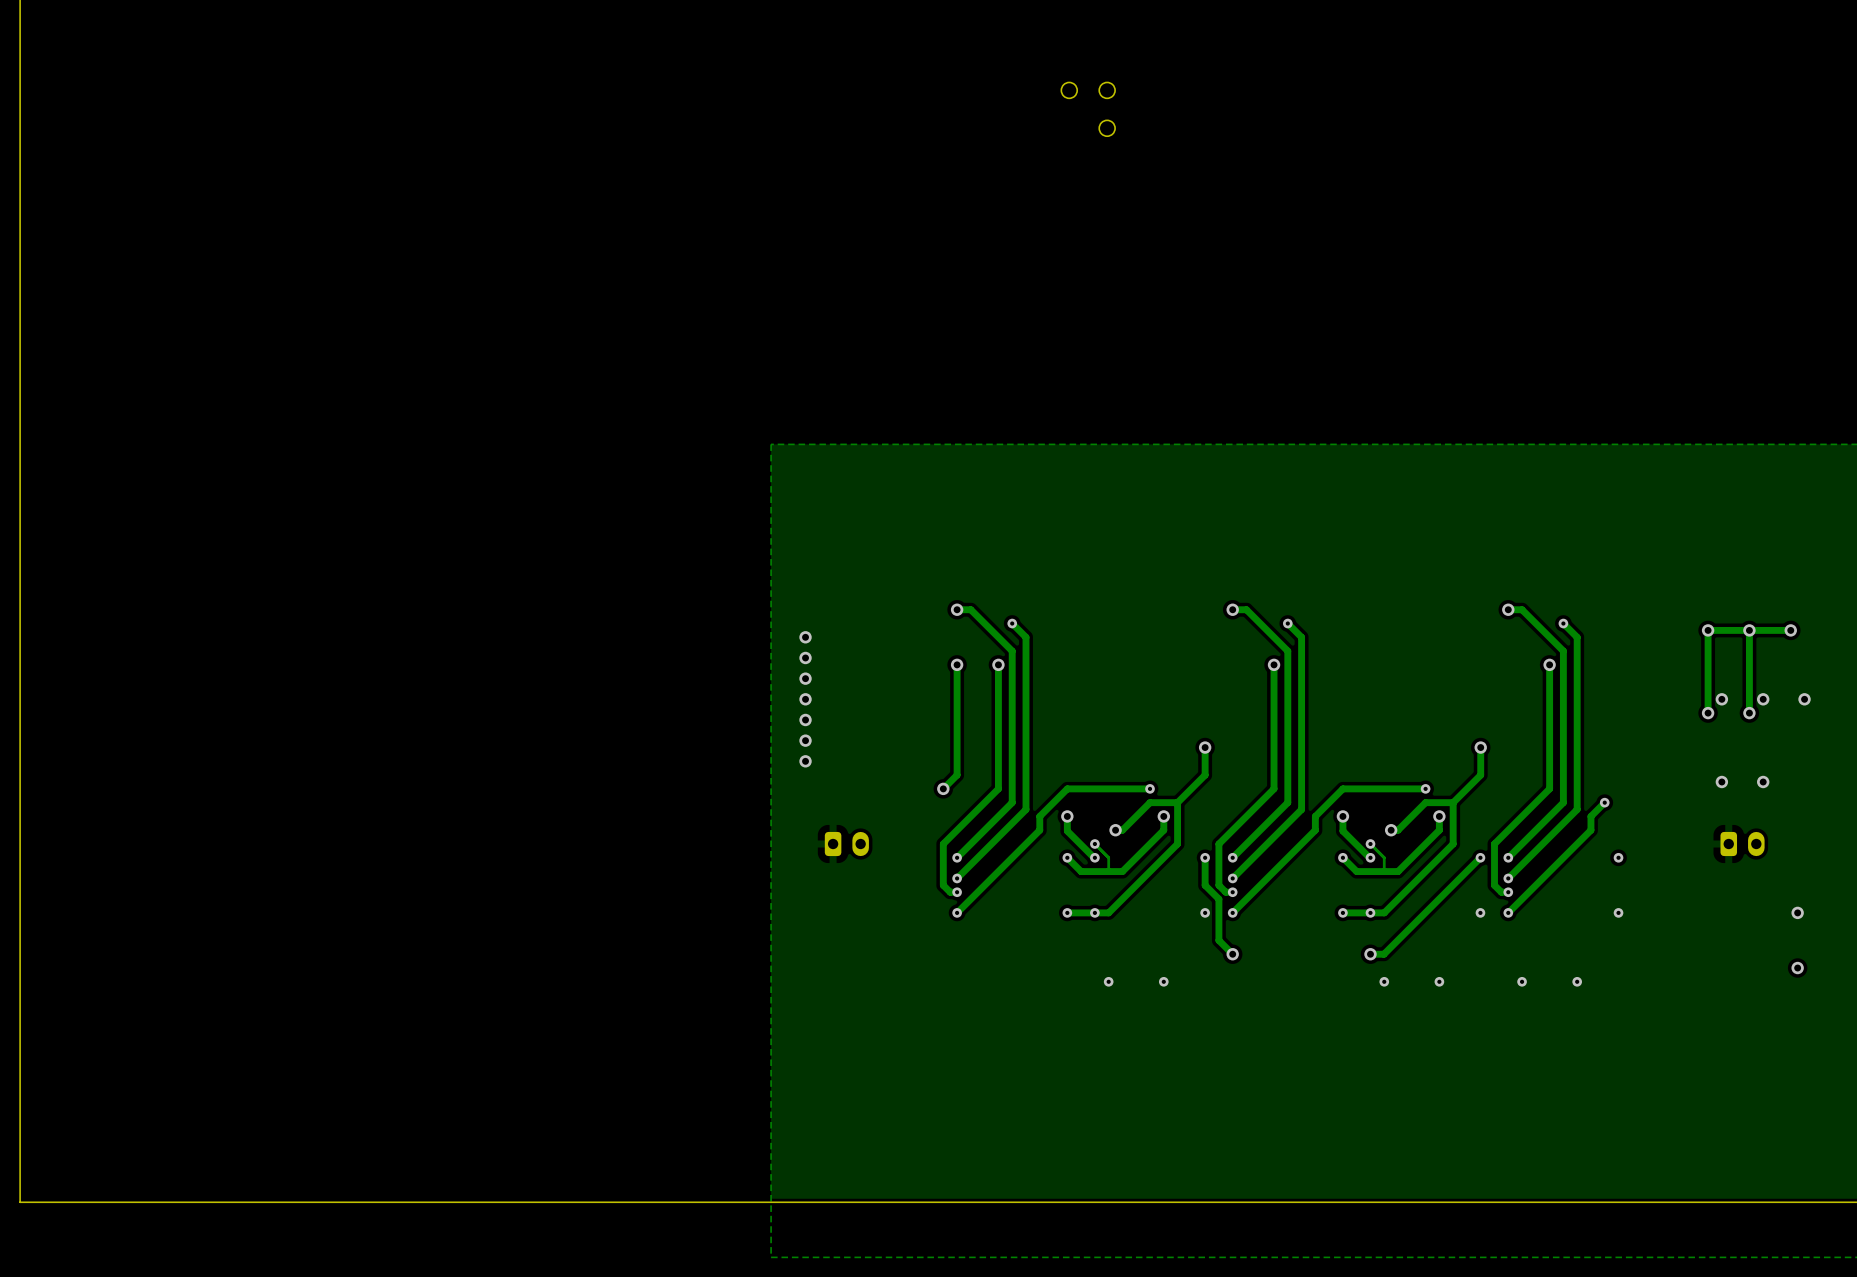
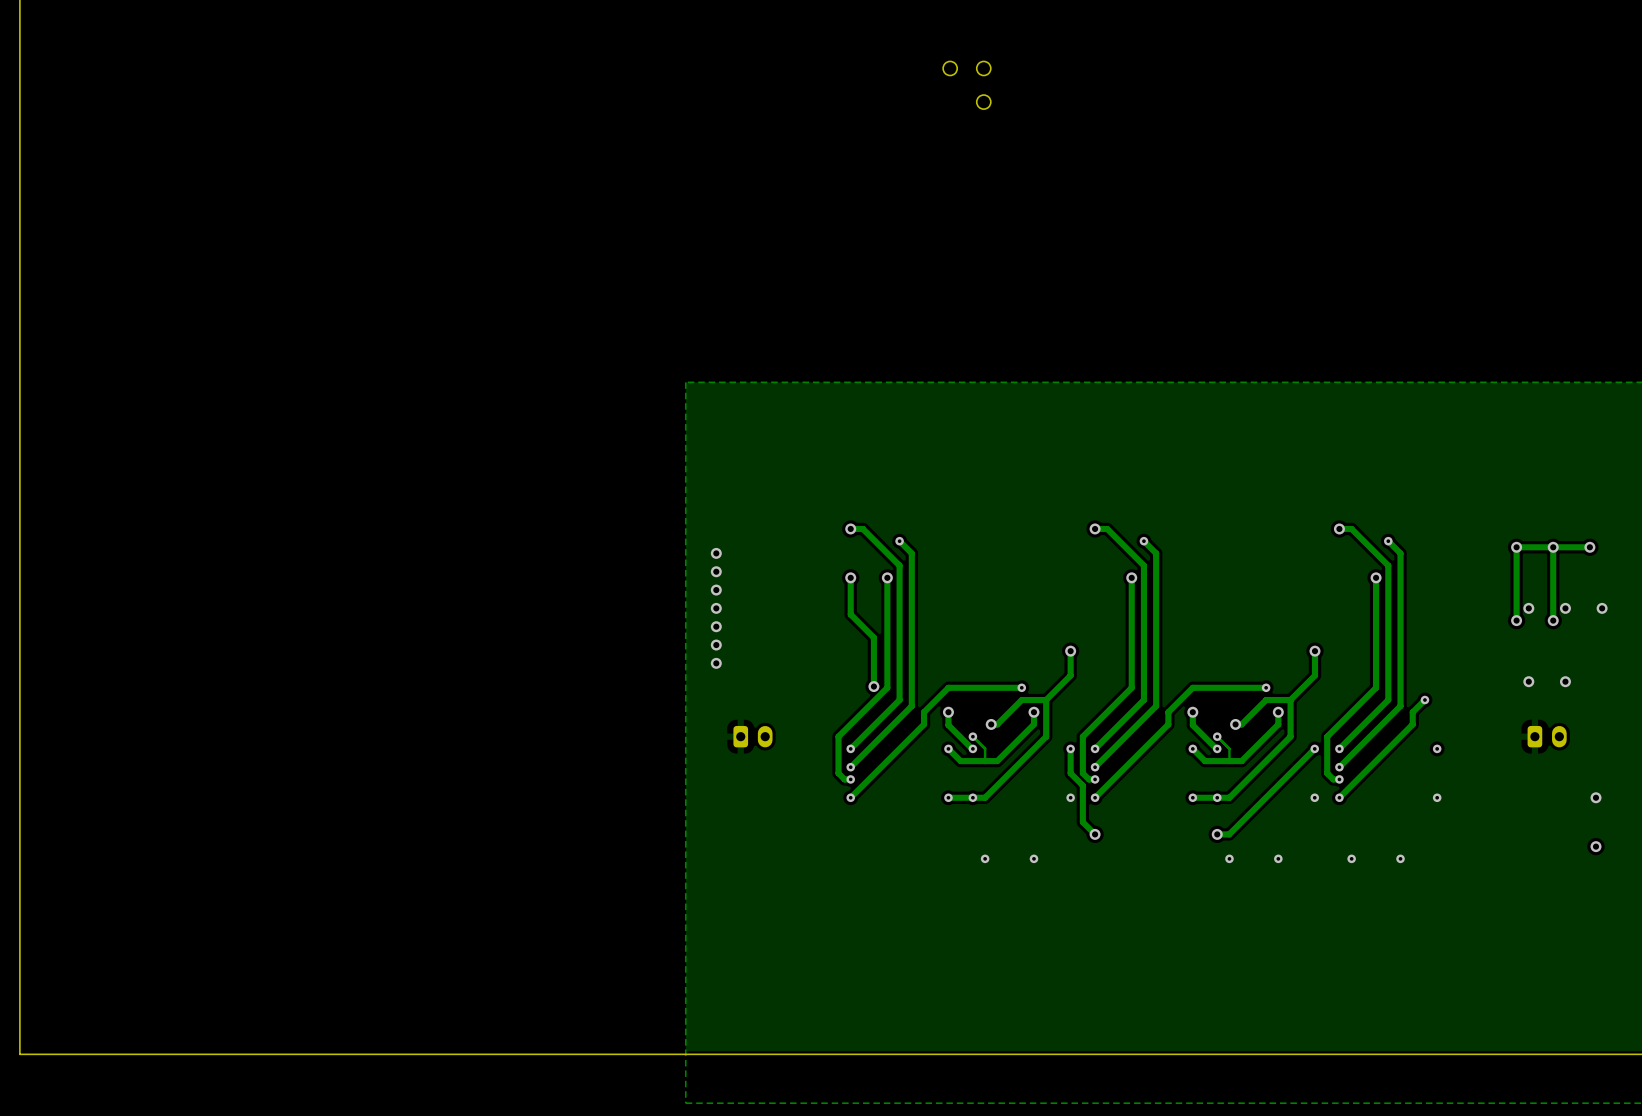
track: (957, 706) (957, 775) (943, 788) -> (850, 614) (873, 637) (873, 686)
via position: (943, 788) -> (873, 686)

